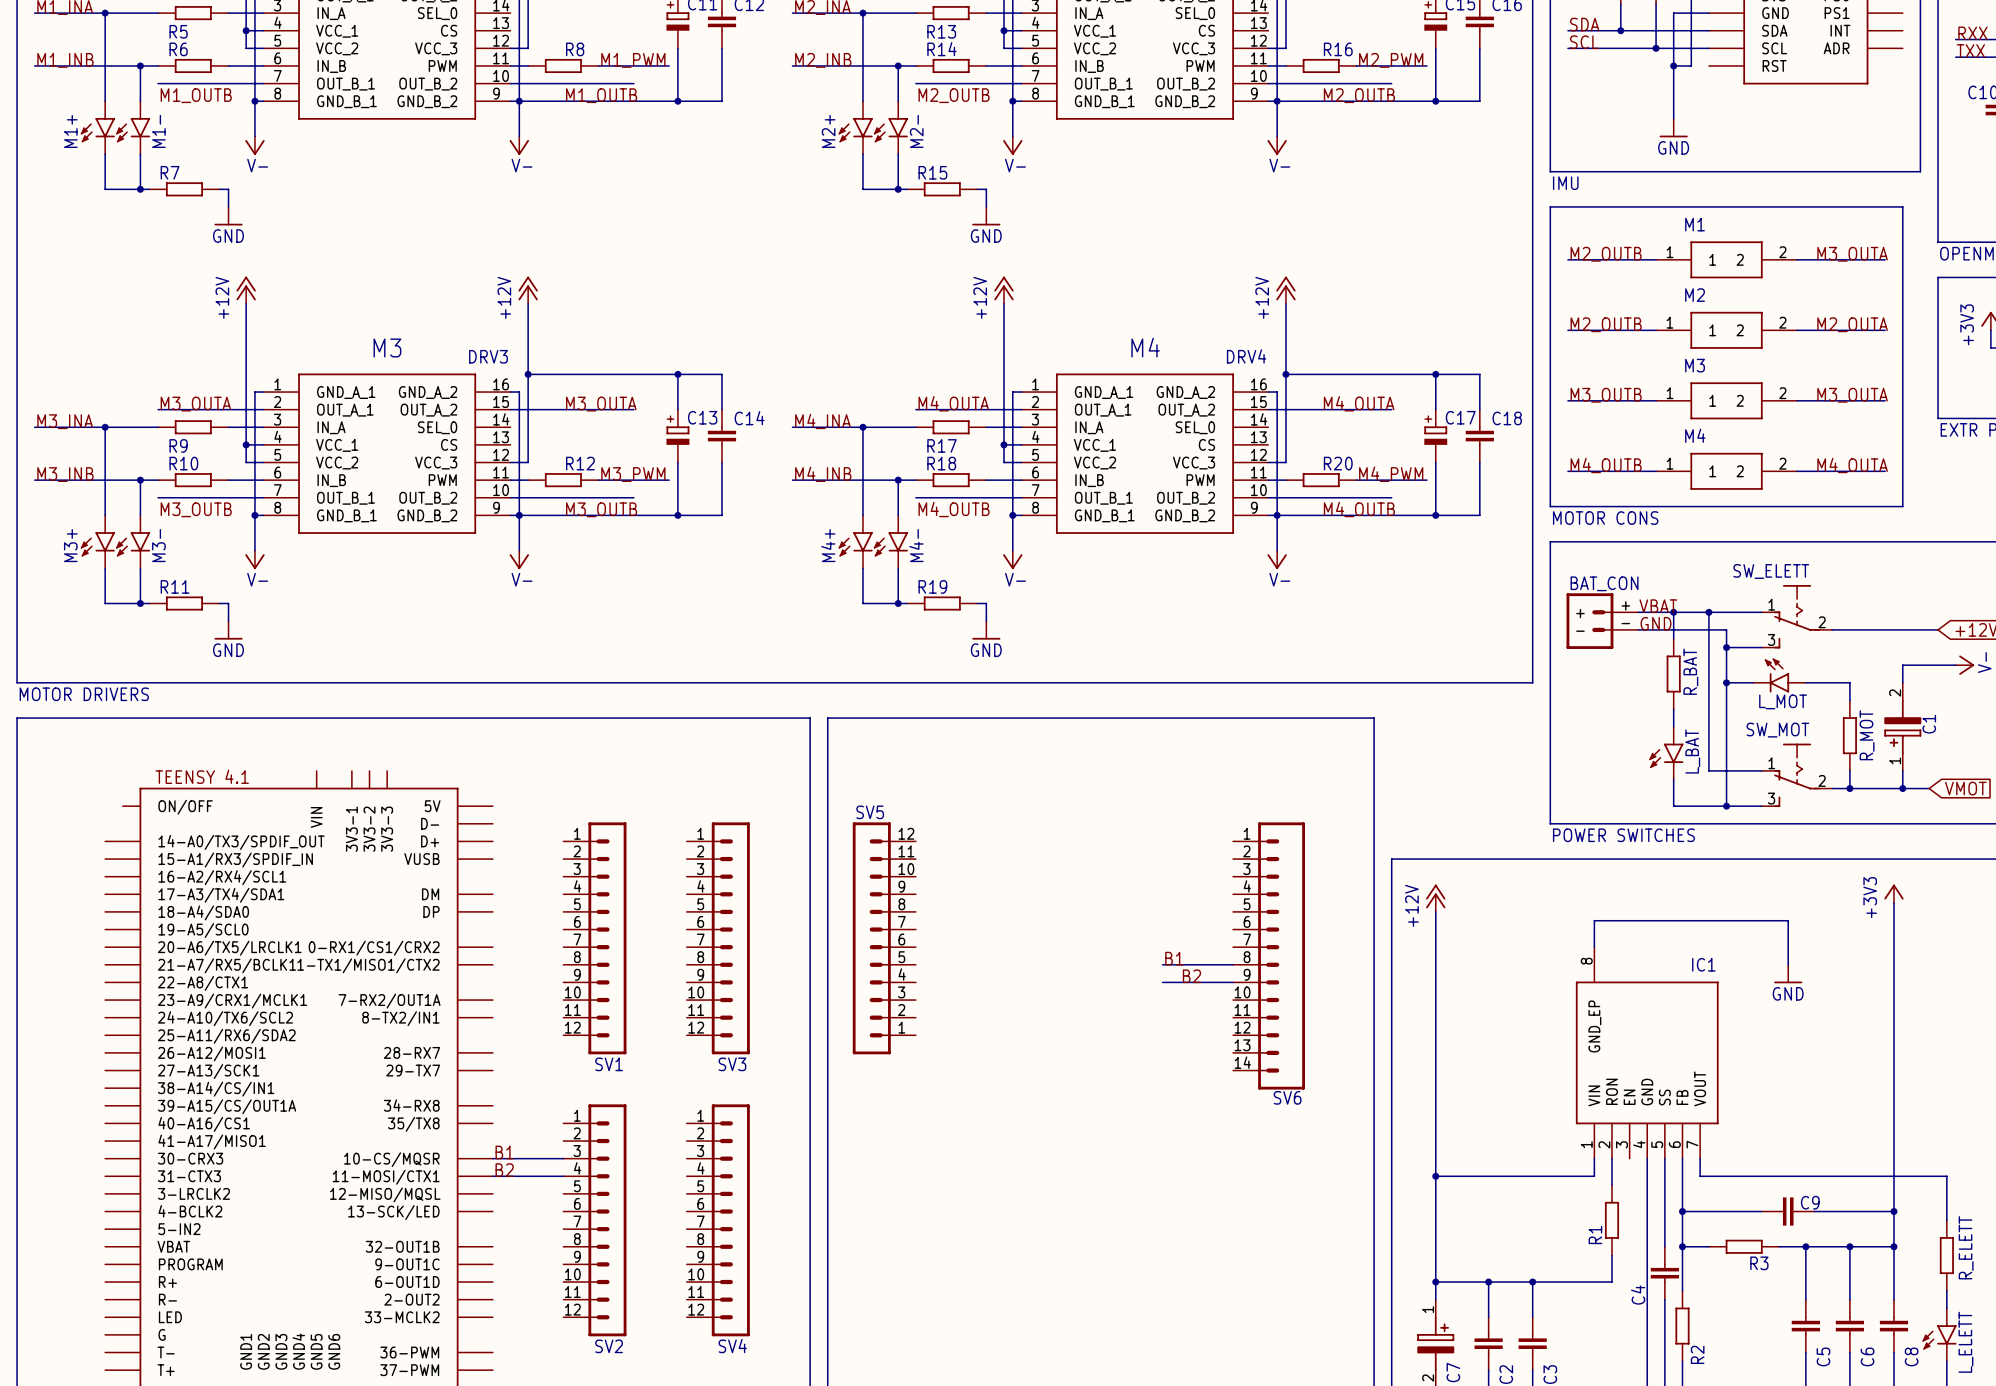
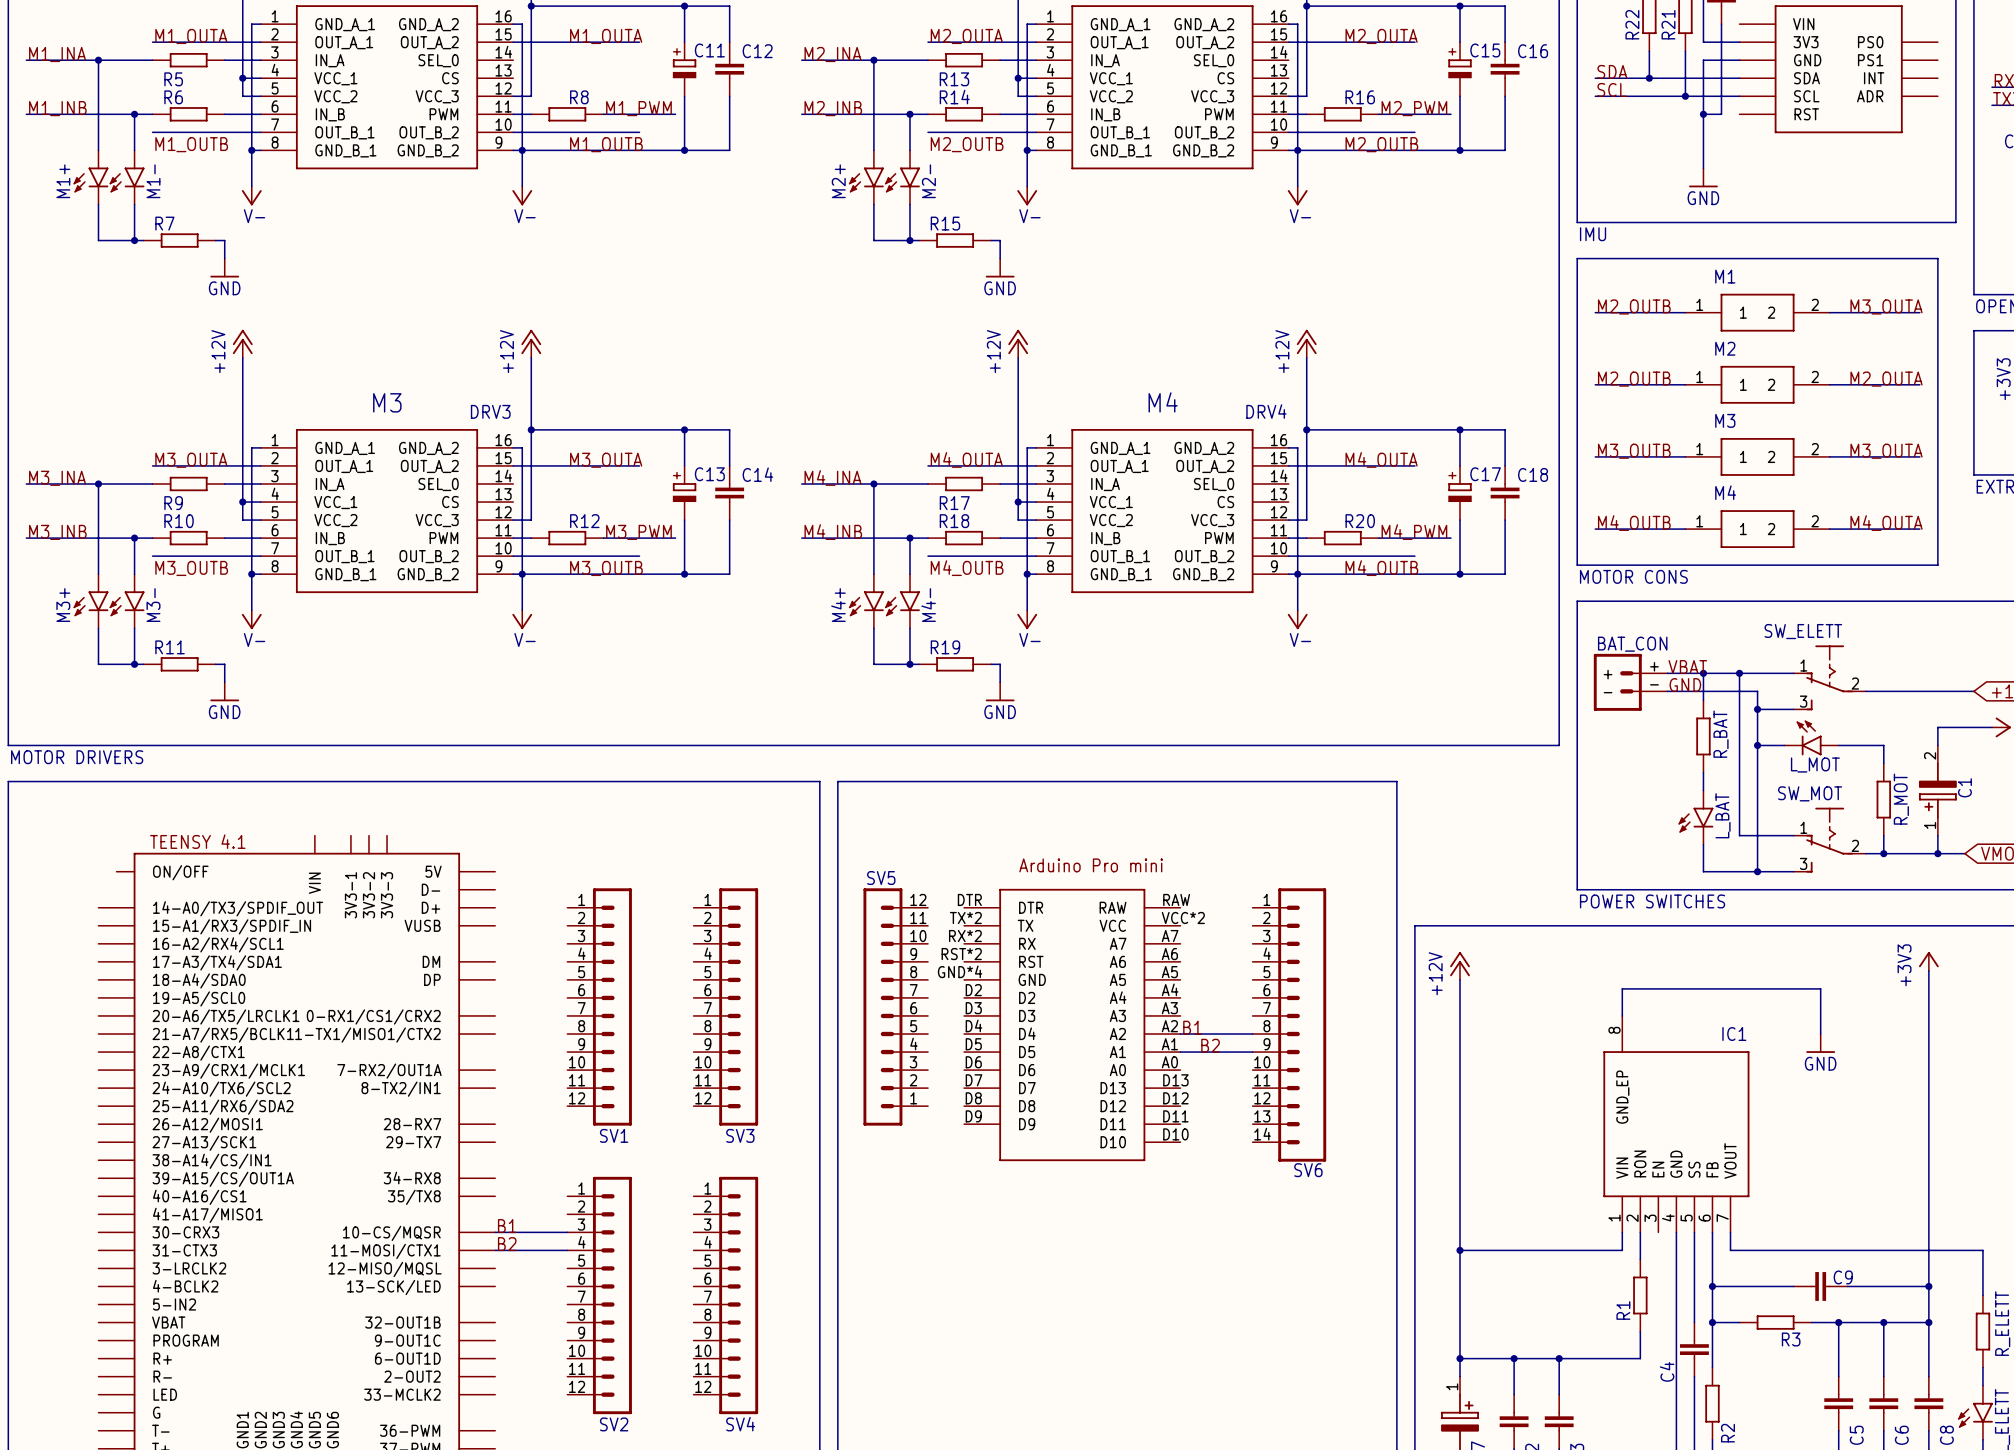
part: none -> (1072, 1024)

